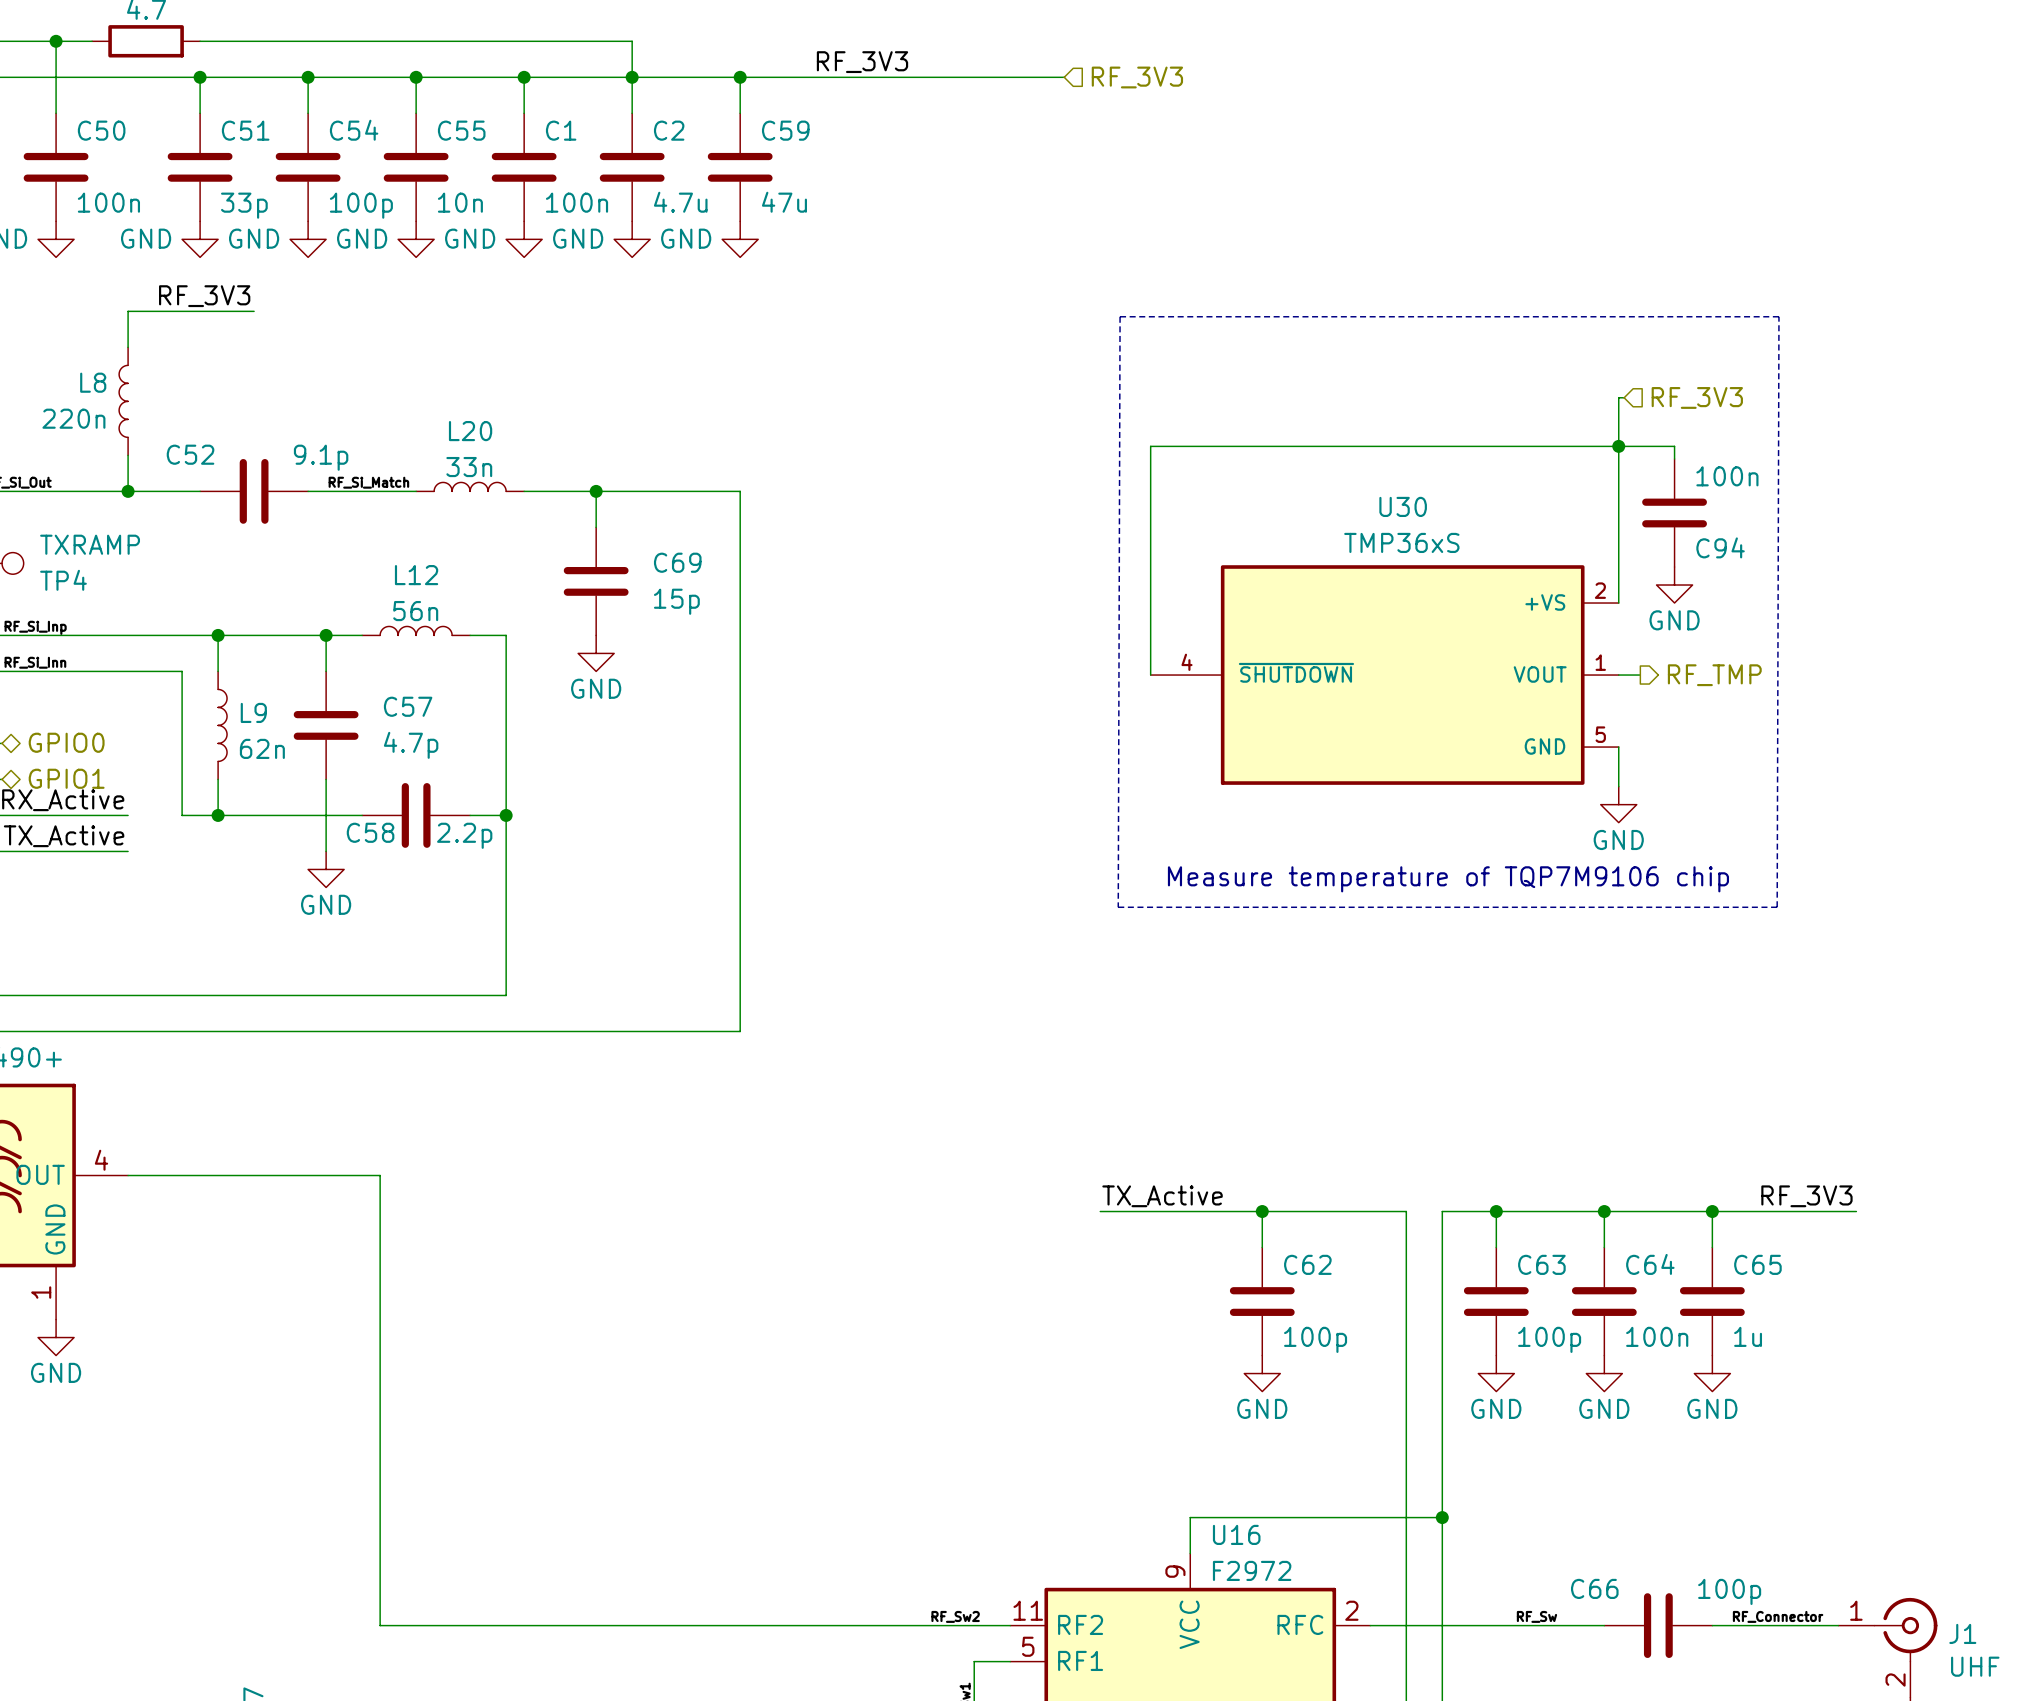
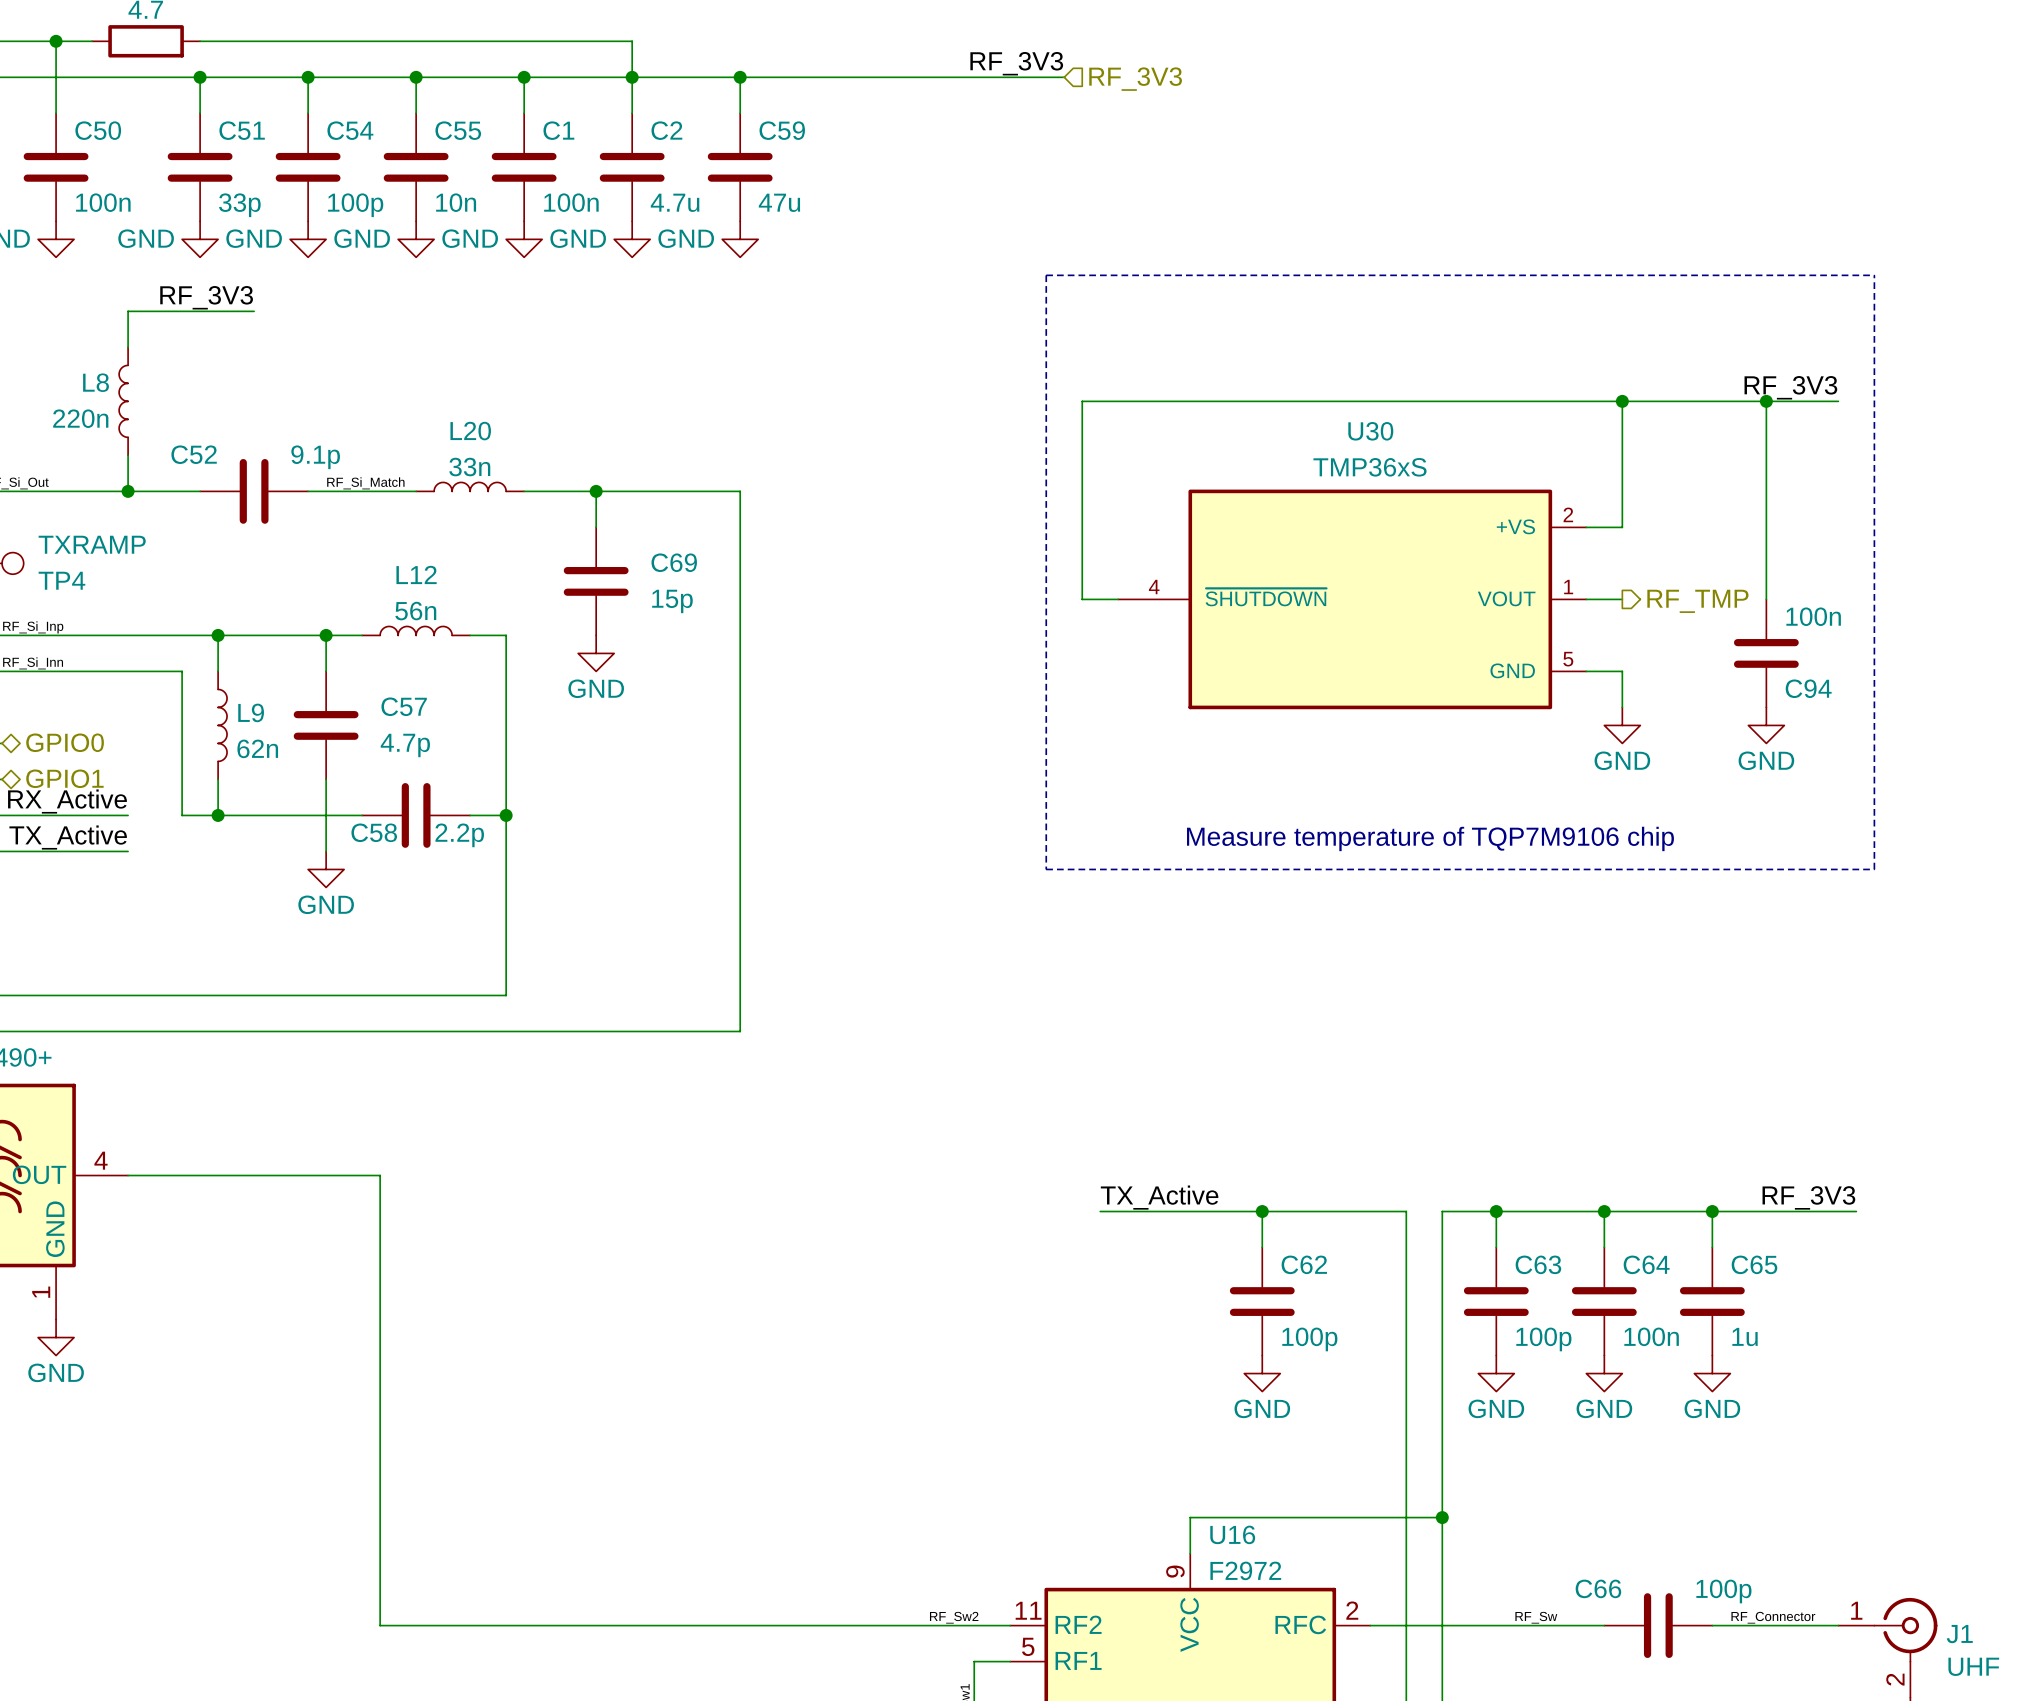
label position: RF_3V3 (862, 62) -> RF_3V3 (1016, 63)
line: (1120, 316) (1118, 907) (1777, 907) (1778, 316) (1120, 316) -> (1046, 275) (1046, 869) (1874, 869) (1874, 275) (1046, 275)
label: none -> RF_3V3 (1790, 387)
wire: (1624, 397) (1618, 397) (1618, 603) -> none
hierarchical label: RF_3V3 (1697, 397) -> none
wire: none -> (1622, 401) (1622, 527) (1586, 527)
wire: none -> (1766, 401) (1766, 599)
junction: none -> (1766, 401)
wire: none -> (1838, 401) (1082, 401) (1082, 599) (1118, 599)
junction position: (1618, 446) -> (1622, 401)
wire: (1674, 458) (1674, 446) (1150, 446) (1150, 675) -> none
C94 position: (1674, 512) -> (1766, 653)
power symbol: GND (1674, 585) -> none
wire: none -> (1586, 599) (1622, 599)
wire: none -> (1586, 671) (1622, 671) (1622, 707)
U30 position: (1384, 675) -> (1352, 599)
wire: (1618, 675) (1640, 675) -> none
hierarchical label position: RF_TMP (1714, 675) -> RF_TMP (1697, 601)
power symbol: none -> GND (1622, 725)
power symbol: none -> GND (1766, 725)
wire: (1618, 747) (1618, 786) -> none
power symbol: GND (1618, 804) -> none
text position: Measure temperature of TQP7M9106 chip (1448, 879) -> Measure temperature of TQP7M9106 chip (1430, 838)

